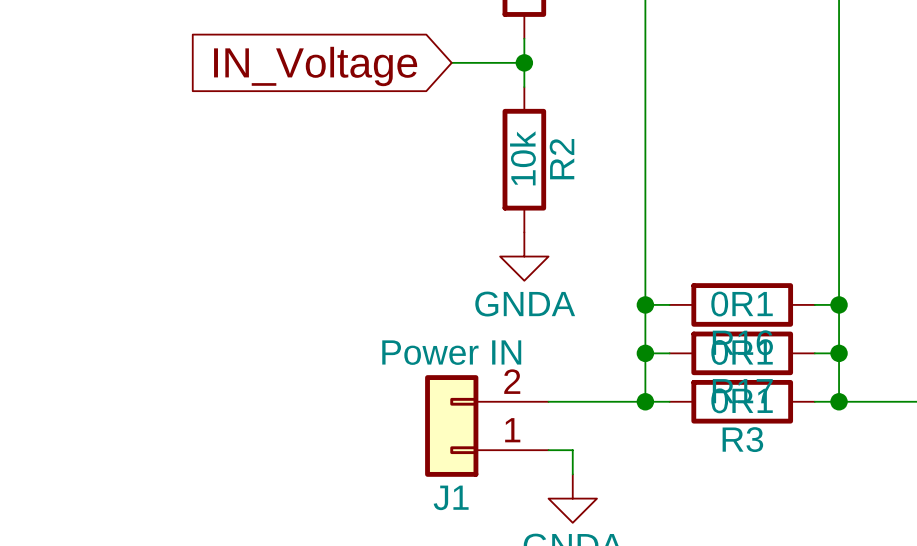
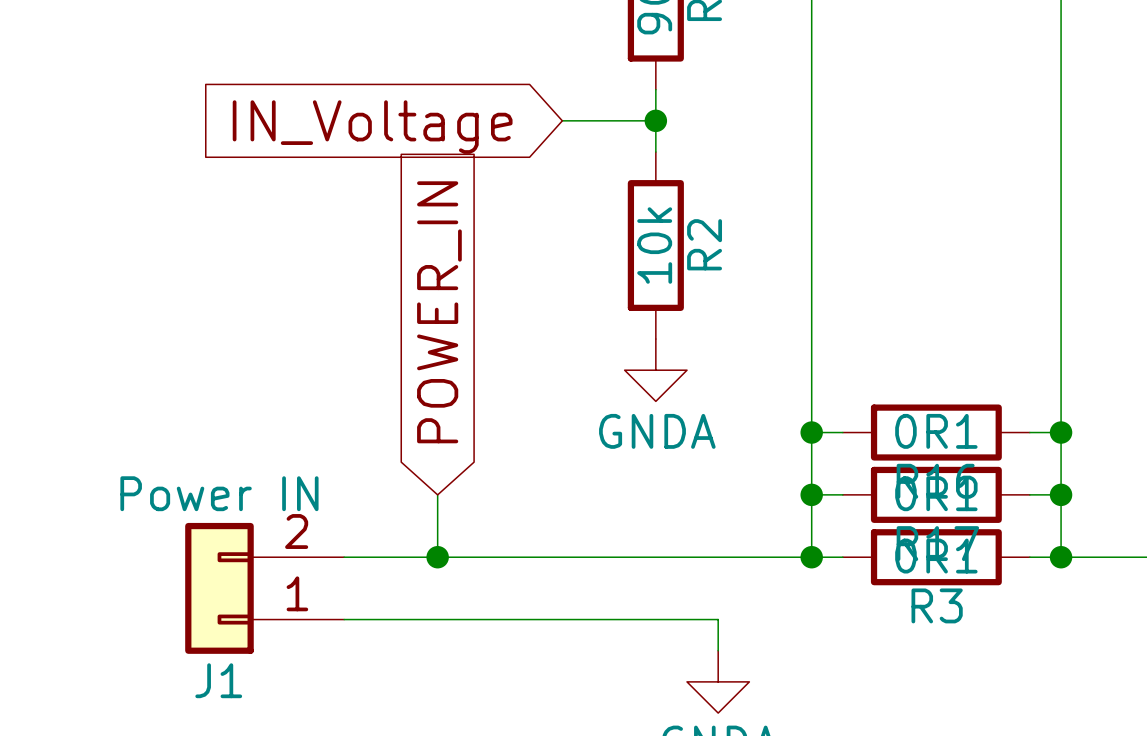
global label: none -> POWER_IN (439, 312)
wire: none -> (437, 494) (437, 557)
wire: none -> (344, 557) (687, 557)
junction: none -> (437, 557)
J1 position: (486, 425) -> (264, 588)
wire: none -> (344, 619) (687, 619)

